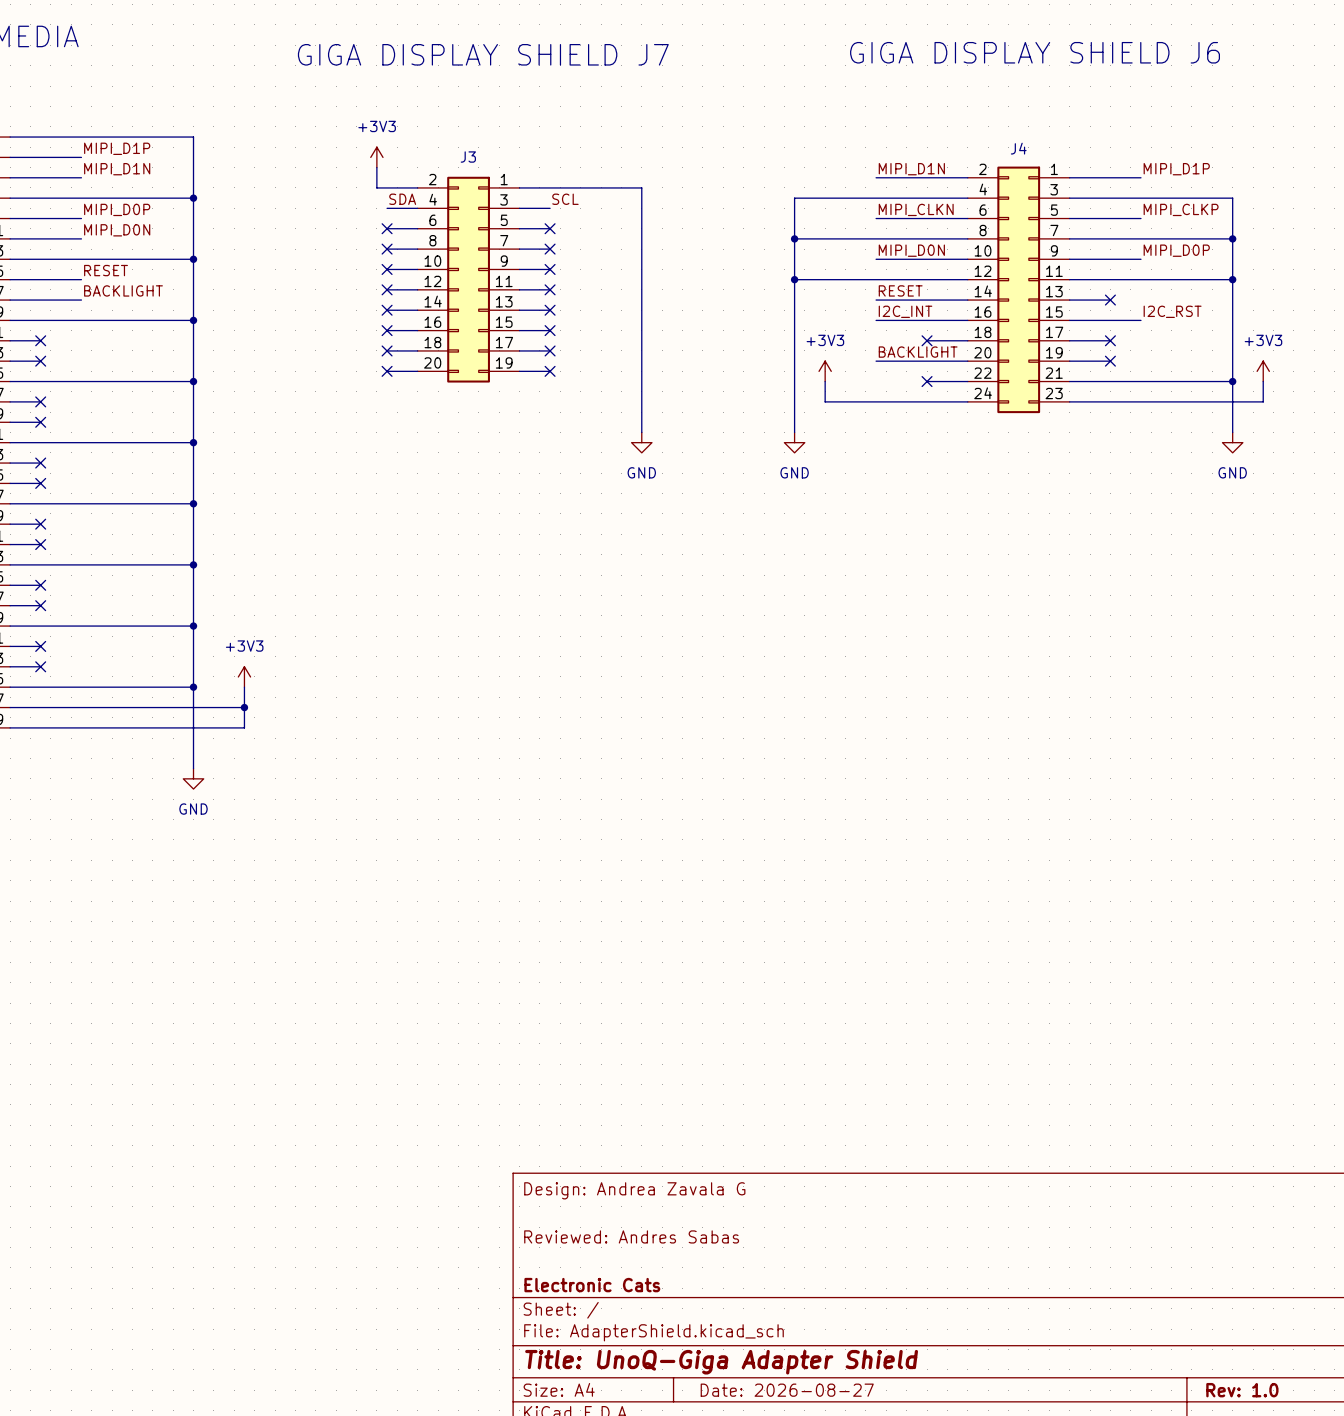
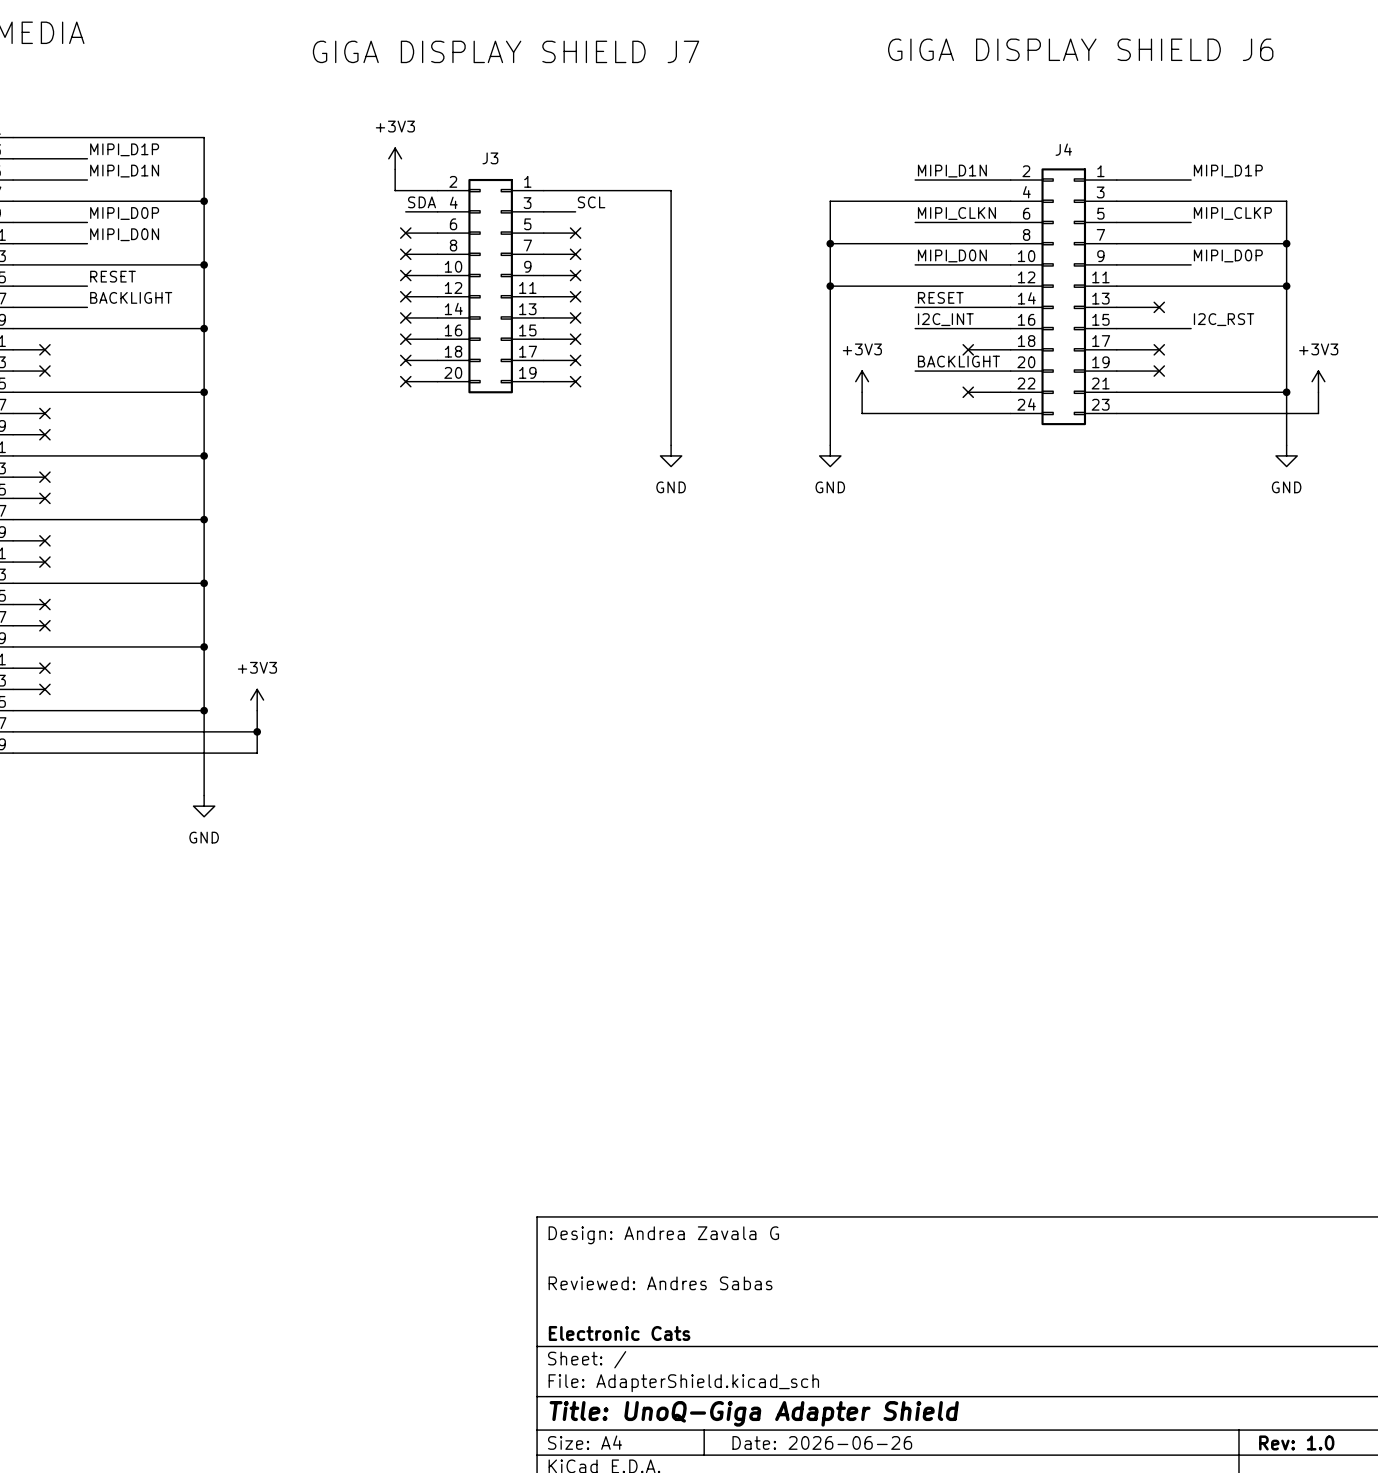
title block: Date: 2026-08-27 (787, 1390) -> Date: 2026-06-26 (822, 1442)

